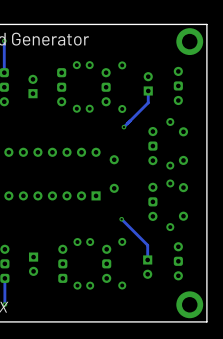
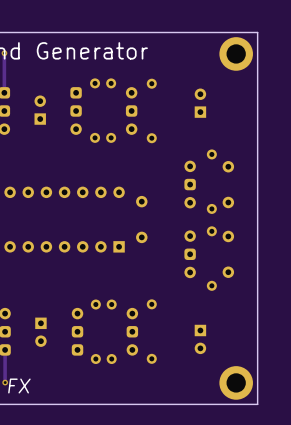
part position: (148, 83) -> (200, 103)
part: (178, 85) -> none
track: (148, 90) (148, 102) (123, 127) -> none
via: (123, 127) -> none
track: (121, 219) (147, 245) (147, 259) -> none
via: (121, 219) -> none
part: (178, 261) -> none
part position: (147, 267) -> (200, 339)

